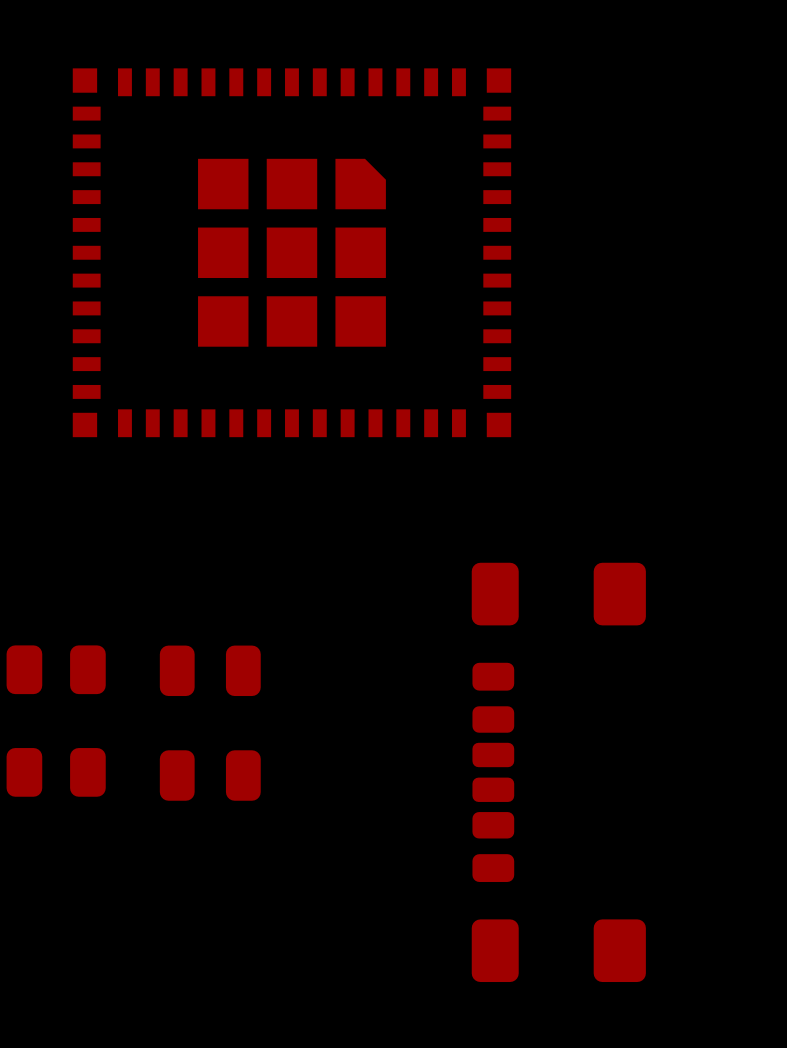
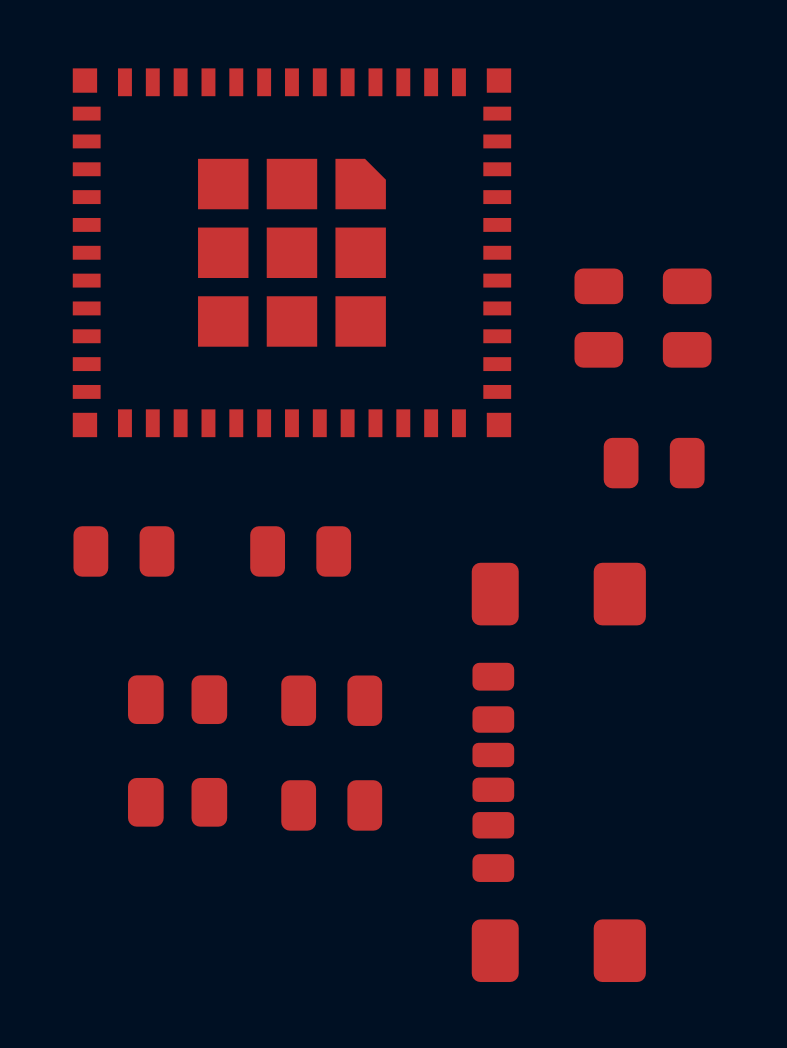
part: none -> (598, 318)
part: none -> (687, 318)
part: none -> (654, 463)
part: none -> (123, 551)
part: none -> (300, 551)
part: (56, 669) -> none
part: (210, 670) -> none
part: none -> (177, 699)
part: none -> (331, 700)
part: (56, 772) -> none
part: (210, 775) -> none
part: none -> (177, 802)
part: none -> (331, 805)

